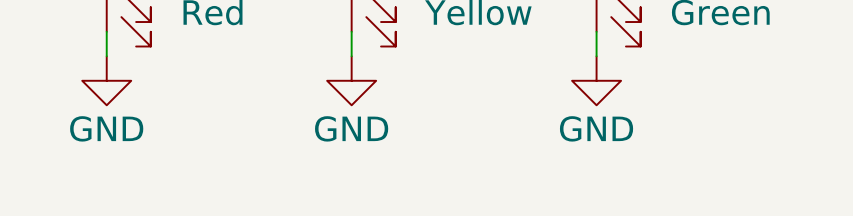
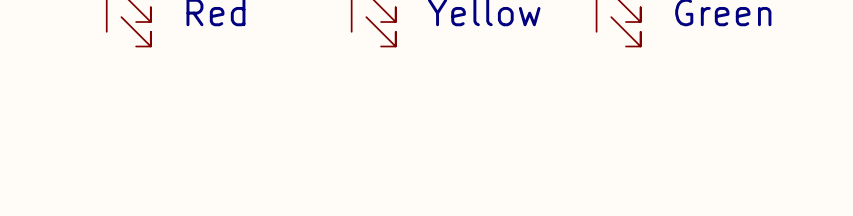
wire: (106, 31) (106, 56) -> none
wire: (351, 31) (351, 56) -> none
wire: (596, 31) (596, 56) -> none
power symbol: GND (106, 80) -> none
power symbol: GND (351, 80) -> none
power symbol: GND (596, 80) -> none

